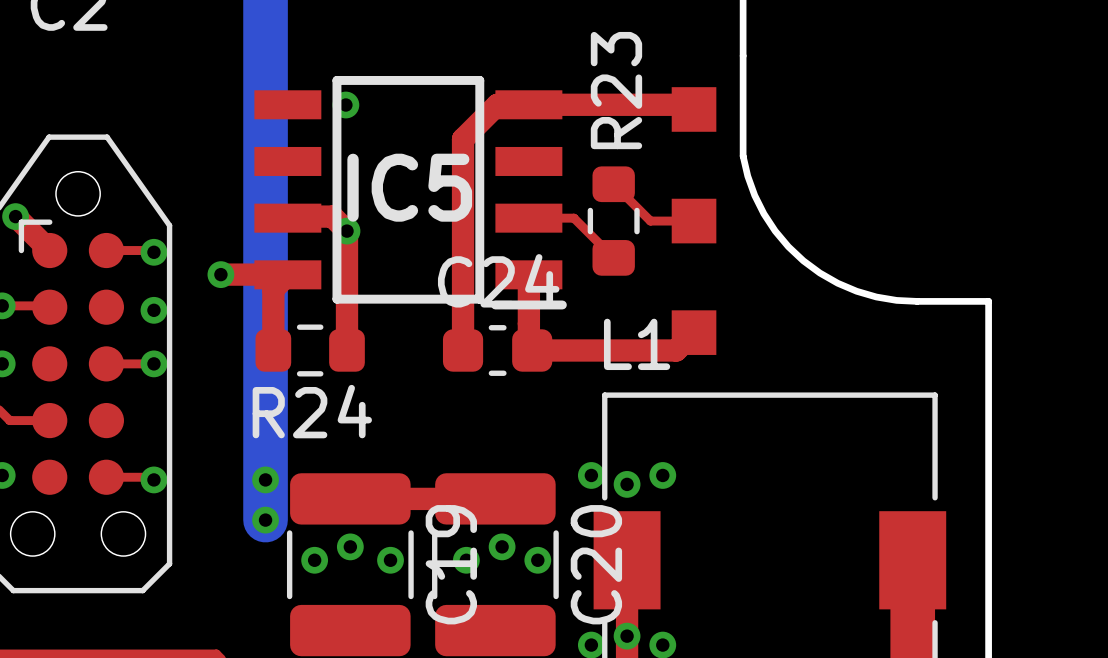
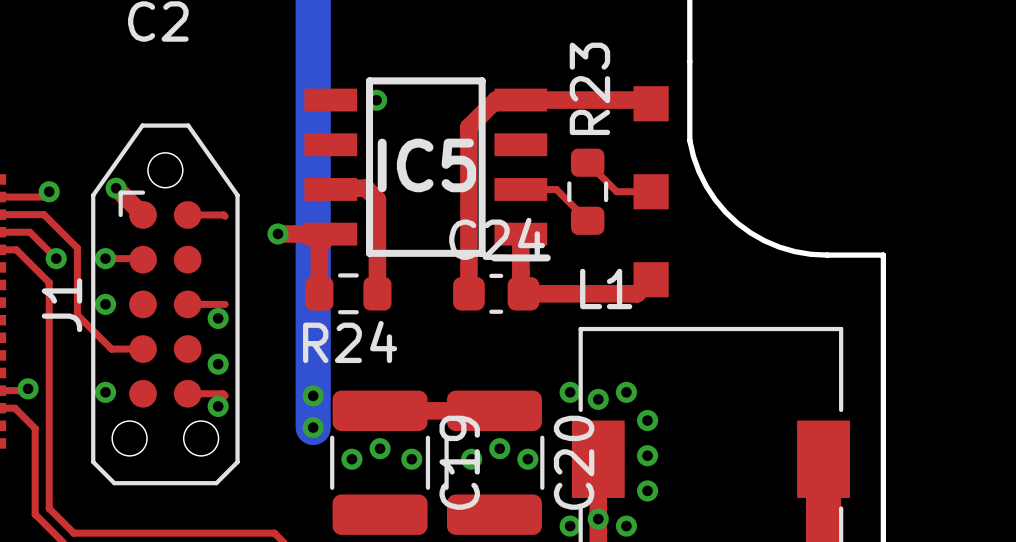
via: (347, 231) -> none
via: (153, 252) -> none
via: (153, 310) -> none
via position: (153, 363) -> (218, 318)
via: none -> (218, 364)
via position: (153, 479) -> (218, 406)
via: none -> (647, 420)
via: none -> (647, 455)
via: none -> (647, 490)

